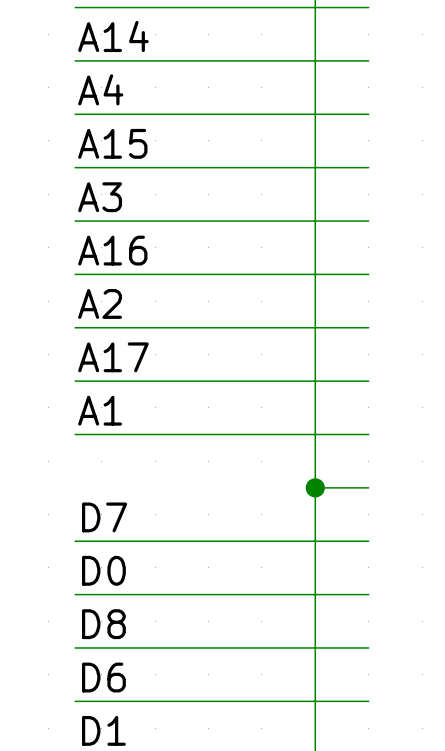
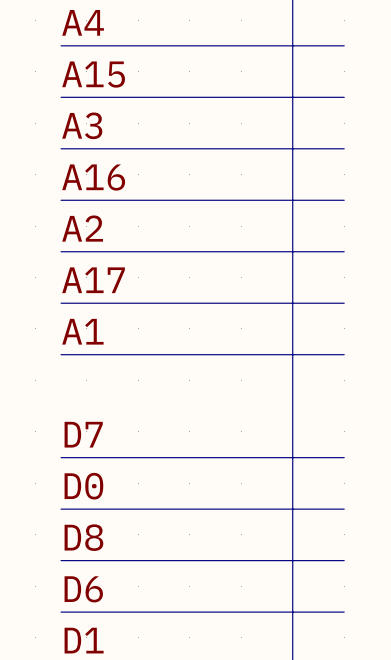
wire: (315, 487) (368, 487) -> none
junction: (315, 487) -> none

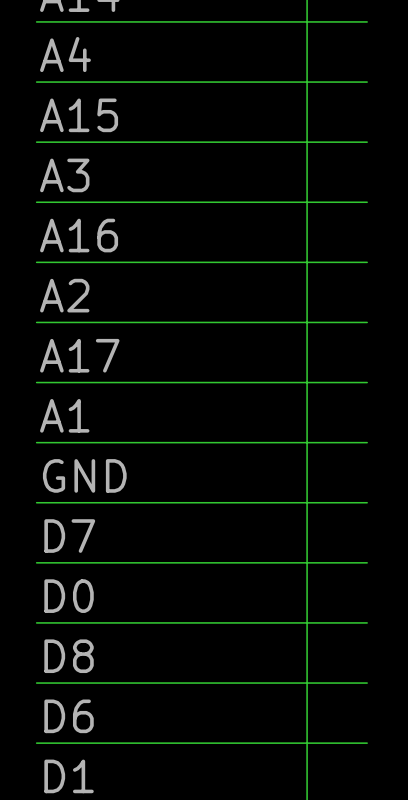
label: none -> GND (84, 475)
wire: none -> (36, 502) (367, 502)

